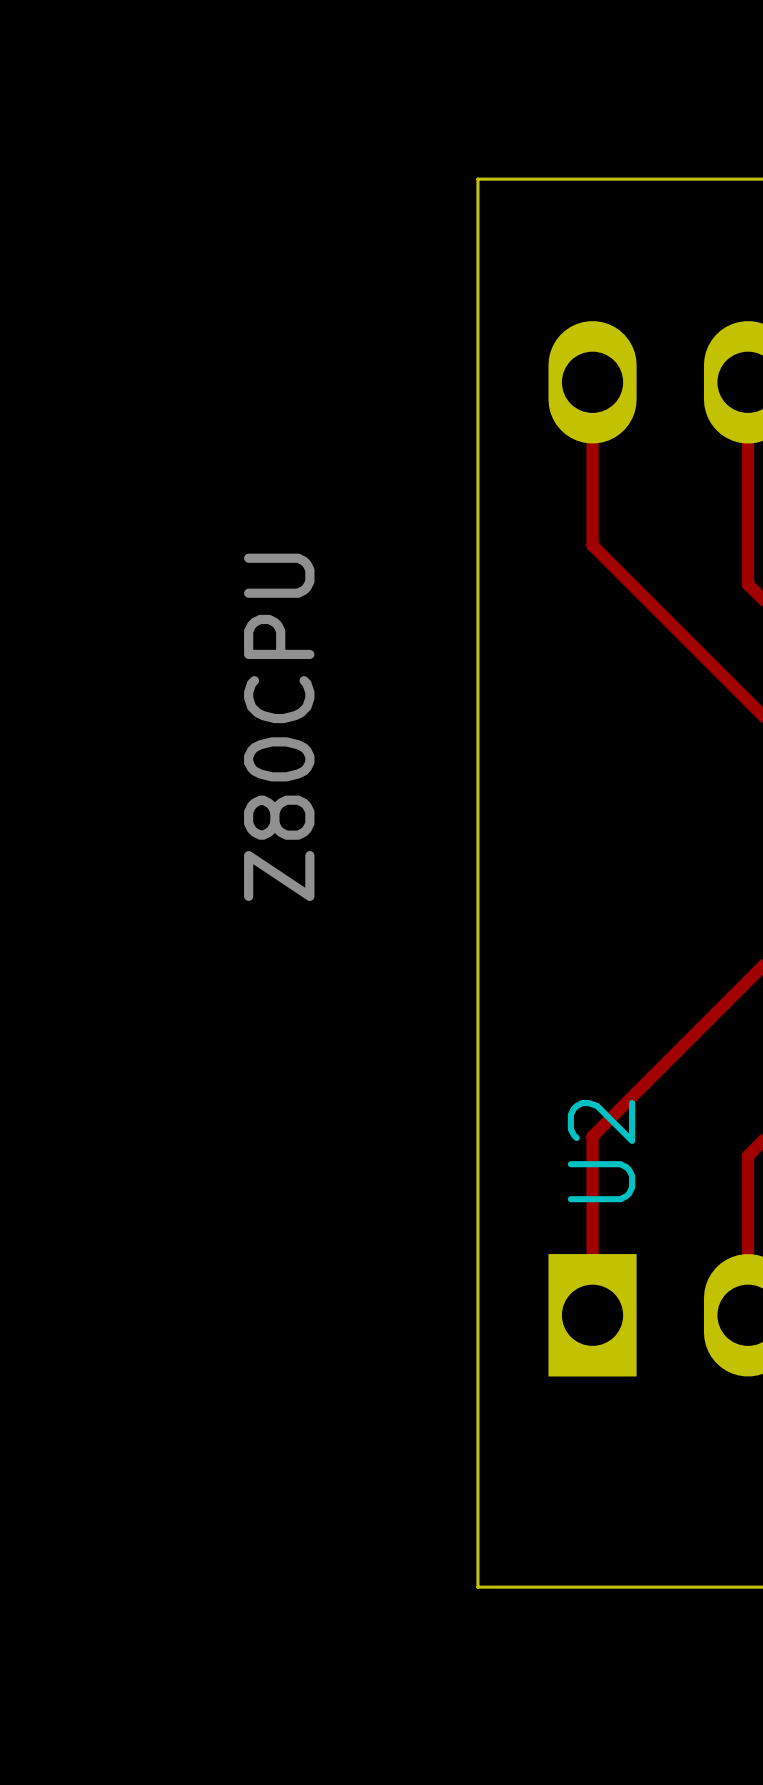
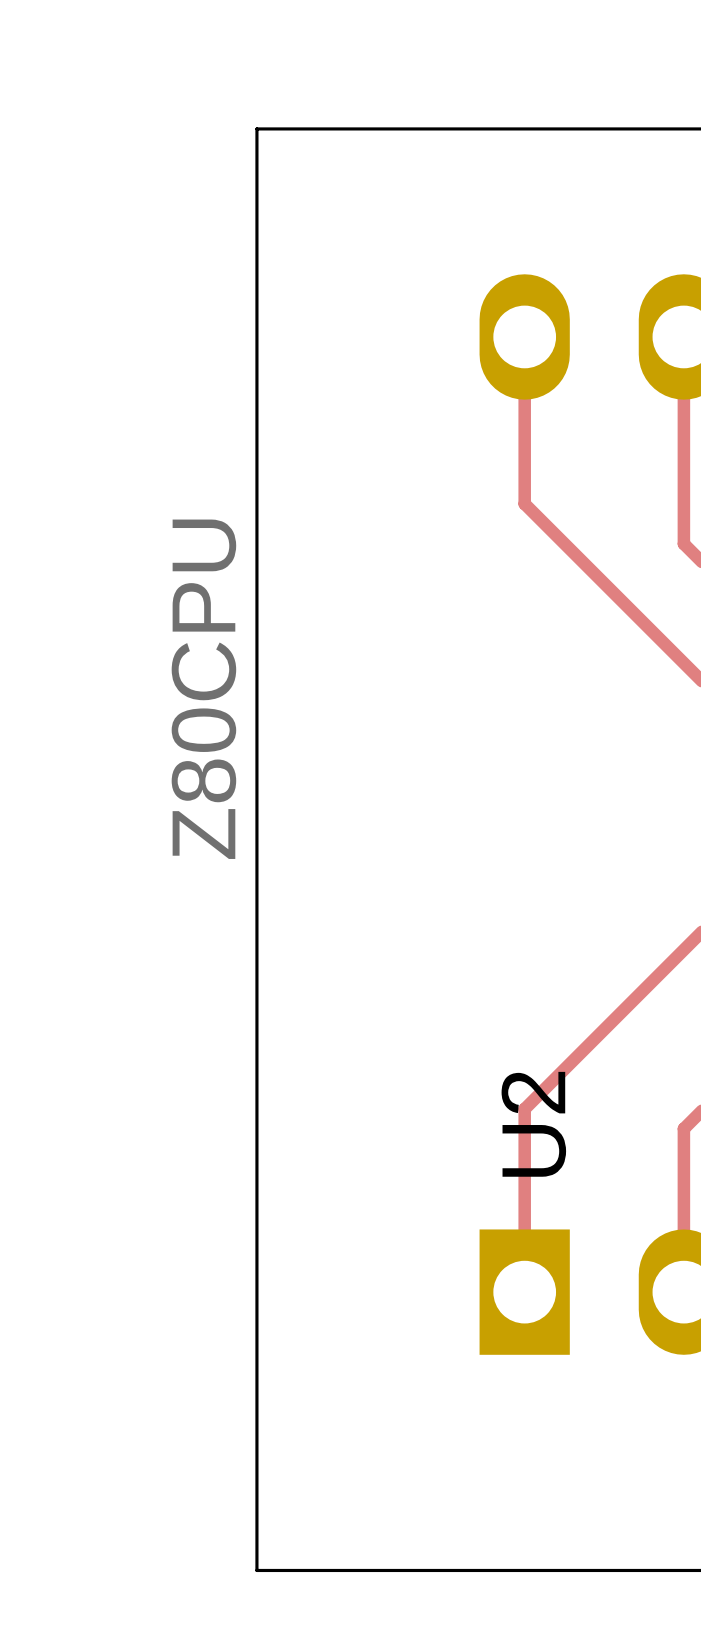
board edge: (477, 179) (477, 1587) -> (407, 128) (256, 128) (256, 1570) (407, 1570)

